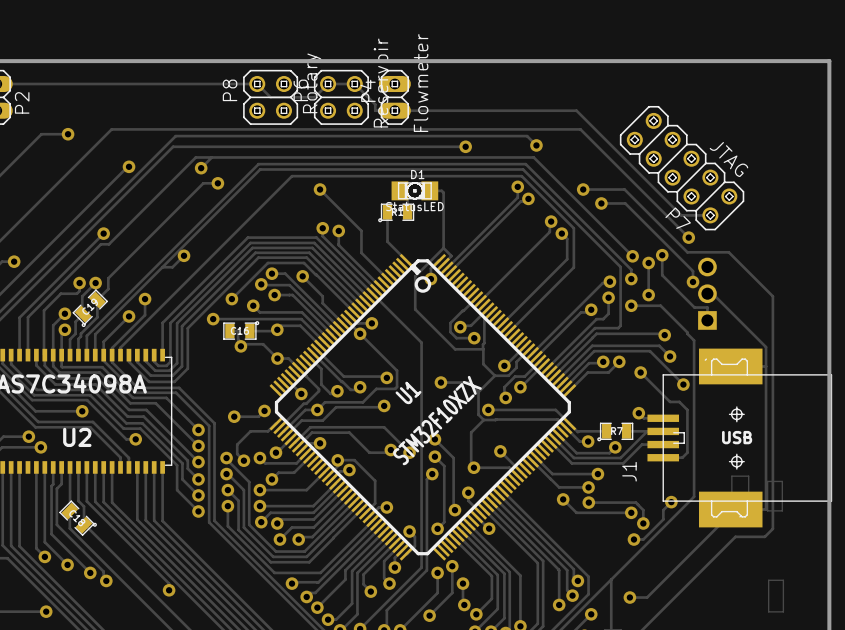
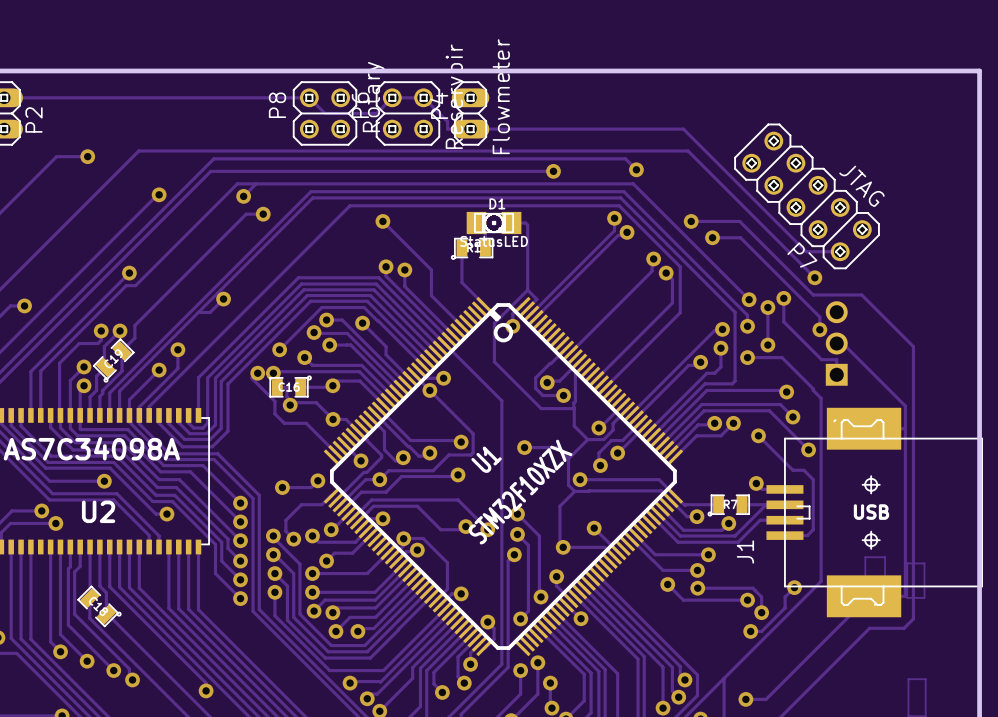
track: (213, 319) (301, 319) -> (273, 373) (274, 371) (359, 371) (361, 373)
via: none -> (273, 373)
track: none -> (251, 377) (274, 401) (274, 413) (284, 423) (306, 423) (335, 452)

